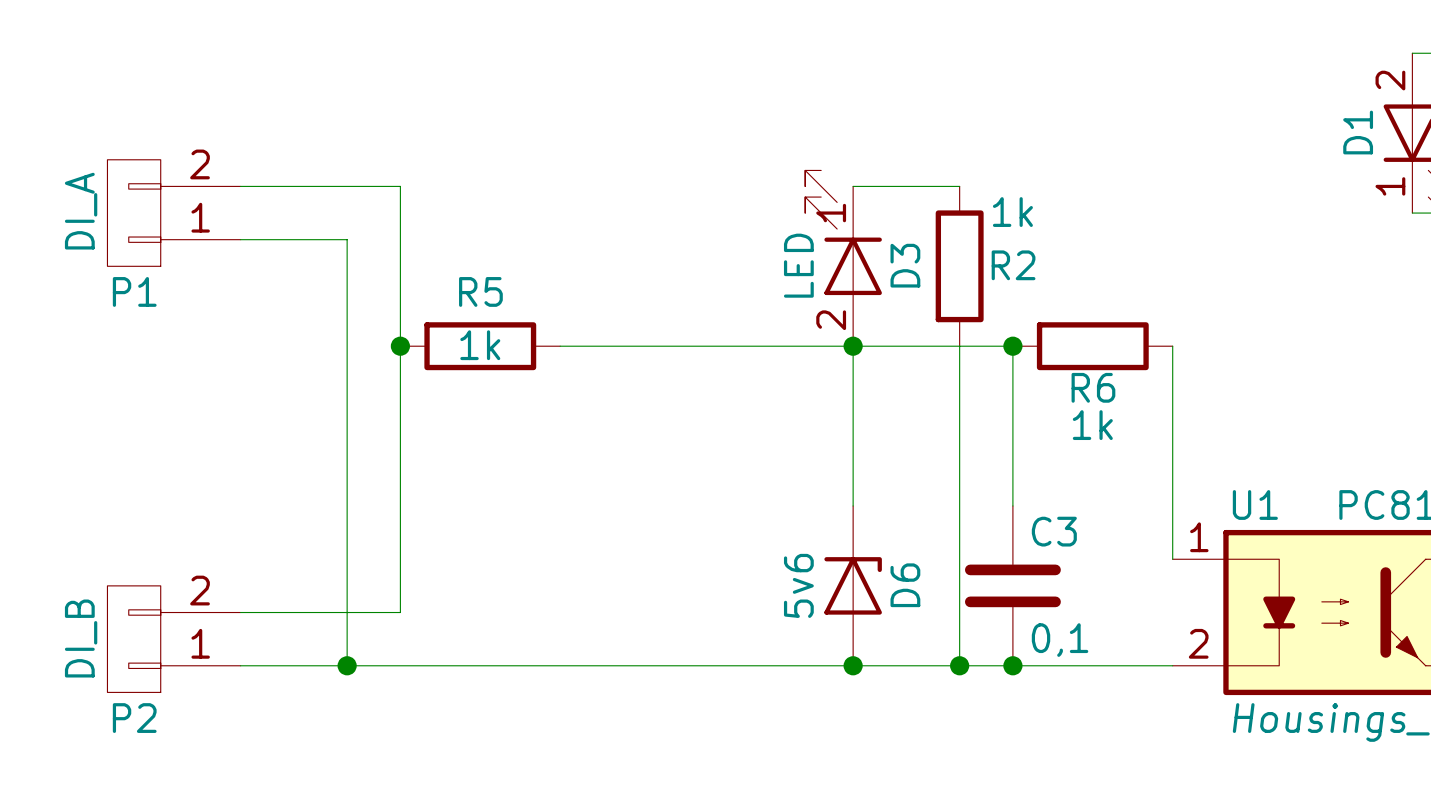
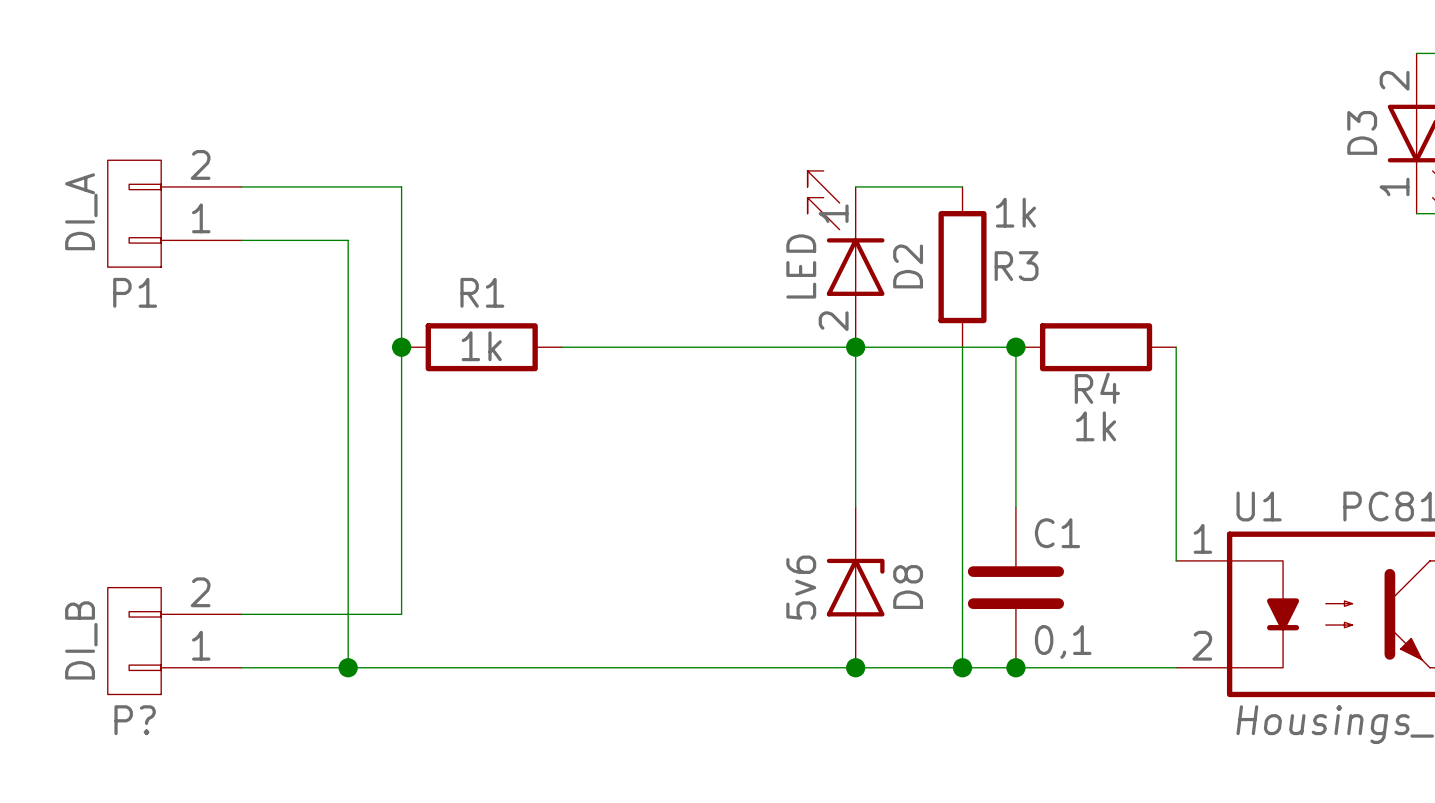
D1 name: D1 (1358, 132) -> D3 (1362, 132)
D3 name: D3 (905, 265) -> D2 (908, 266)
R2 name: R2 (1013, 265) -> R3 (1016, 266)
R5 name: R5 (480, 291) -> R1 (482, 292)
R6 name: R6 (1093, 387) -> R4 (1097, 388)
C3 name: C3 (1054, 531) -> C1 (1057, 533)
D6 name: D6 (905, 585) -> D8 (908, 586)
P2 name: P2 (134, 718) -> P? (135, 720)

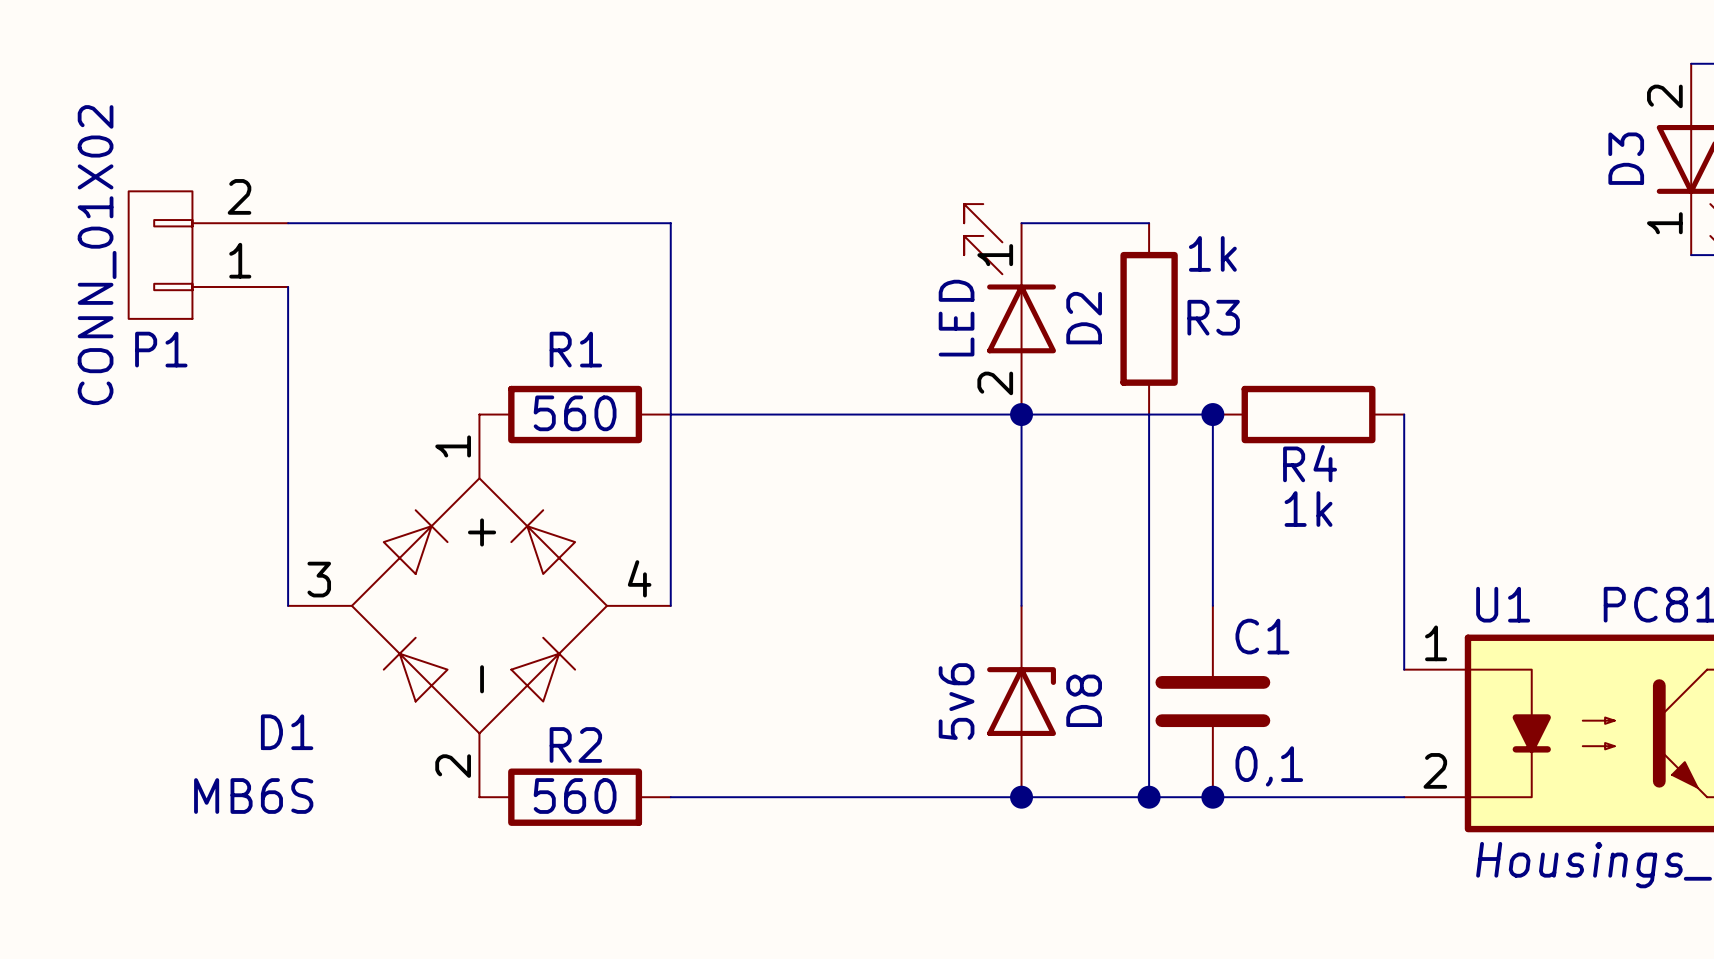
wire: (401, 186) (401, 614) (241, 614) -> (479, 223) (670, 223) (670, 605)
P1 value: DI_A (81, 211) -> CONN_01X02 (97, 255)
wire: (241, 240) (348, 240) (348, 667) -> (288, 286) (288, 605)
R1 value: 1k (481, 346) -> 560 (575, 413)
junction: (401, 347) -> none
D1: none -> MB6S (479, 605)
P?: DI_B (174, 641) -> none
wire: (241, 667) (561, 667) -> none
junction: (348, 667) -> none
R2: none -> 560 (575, 797)

